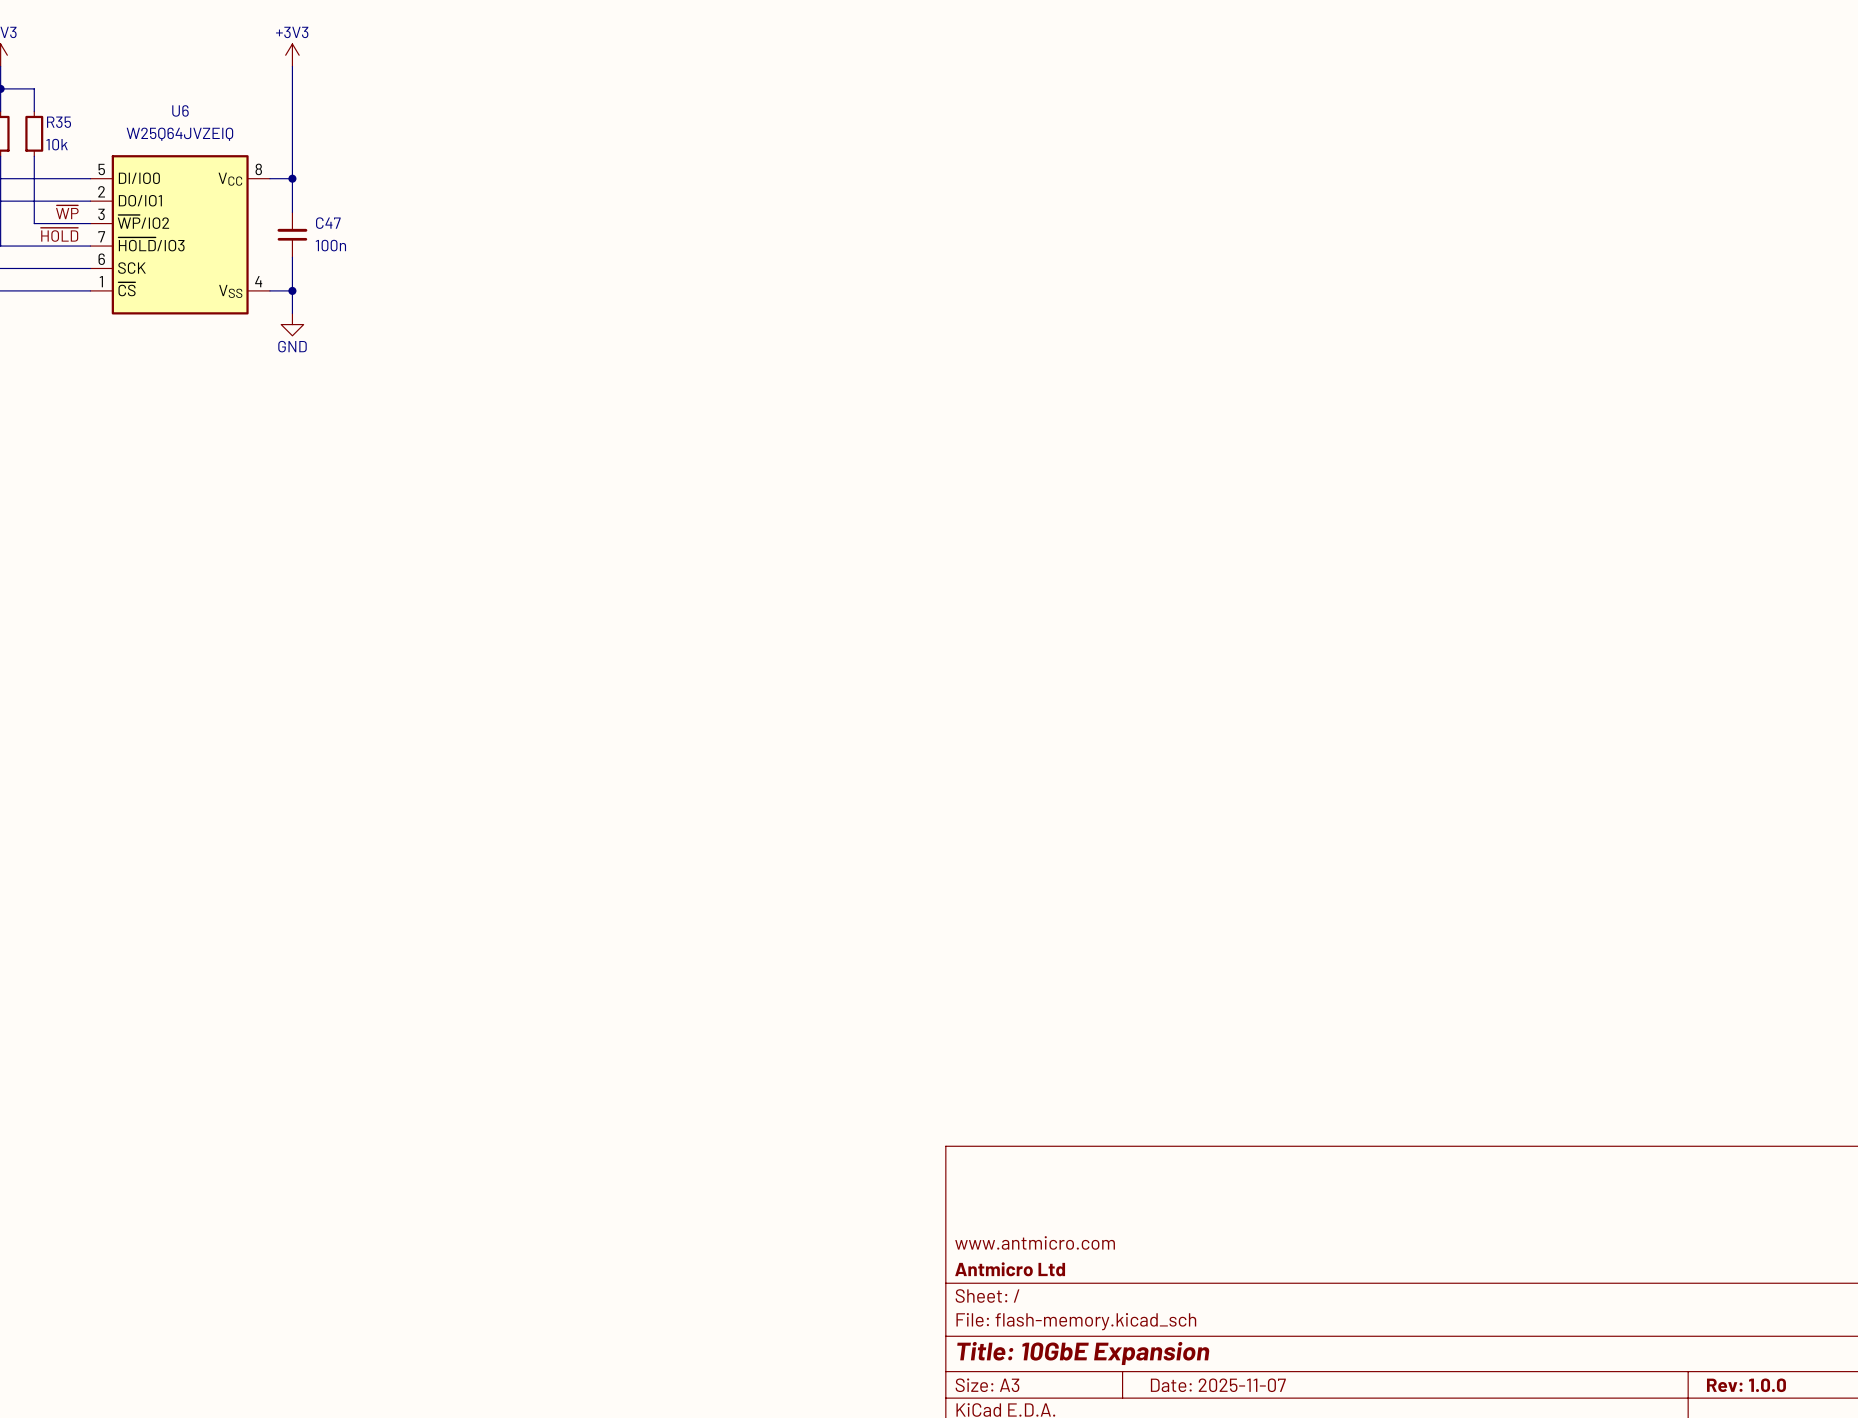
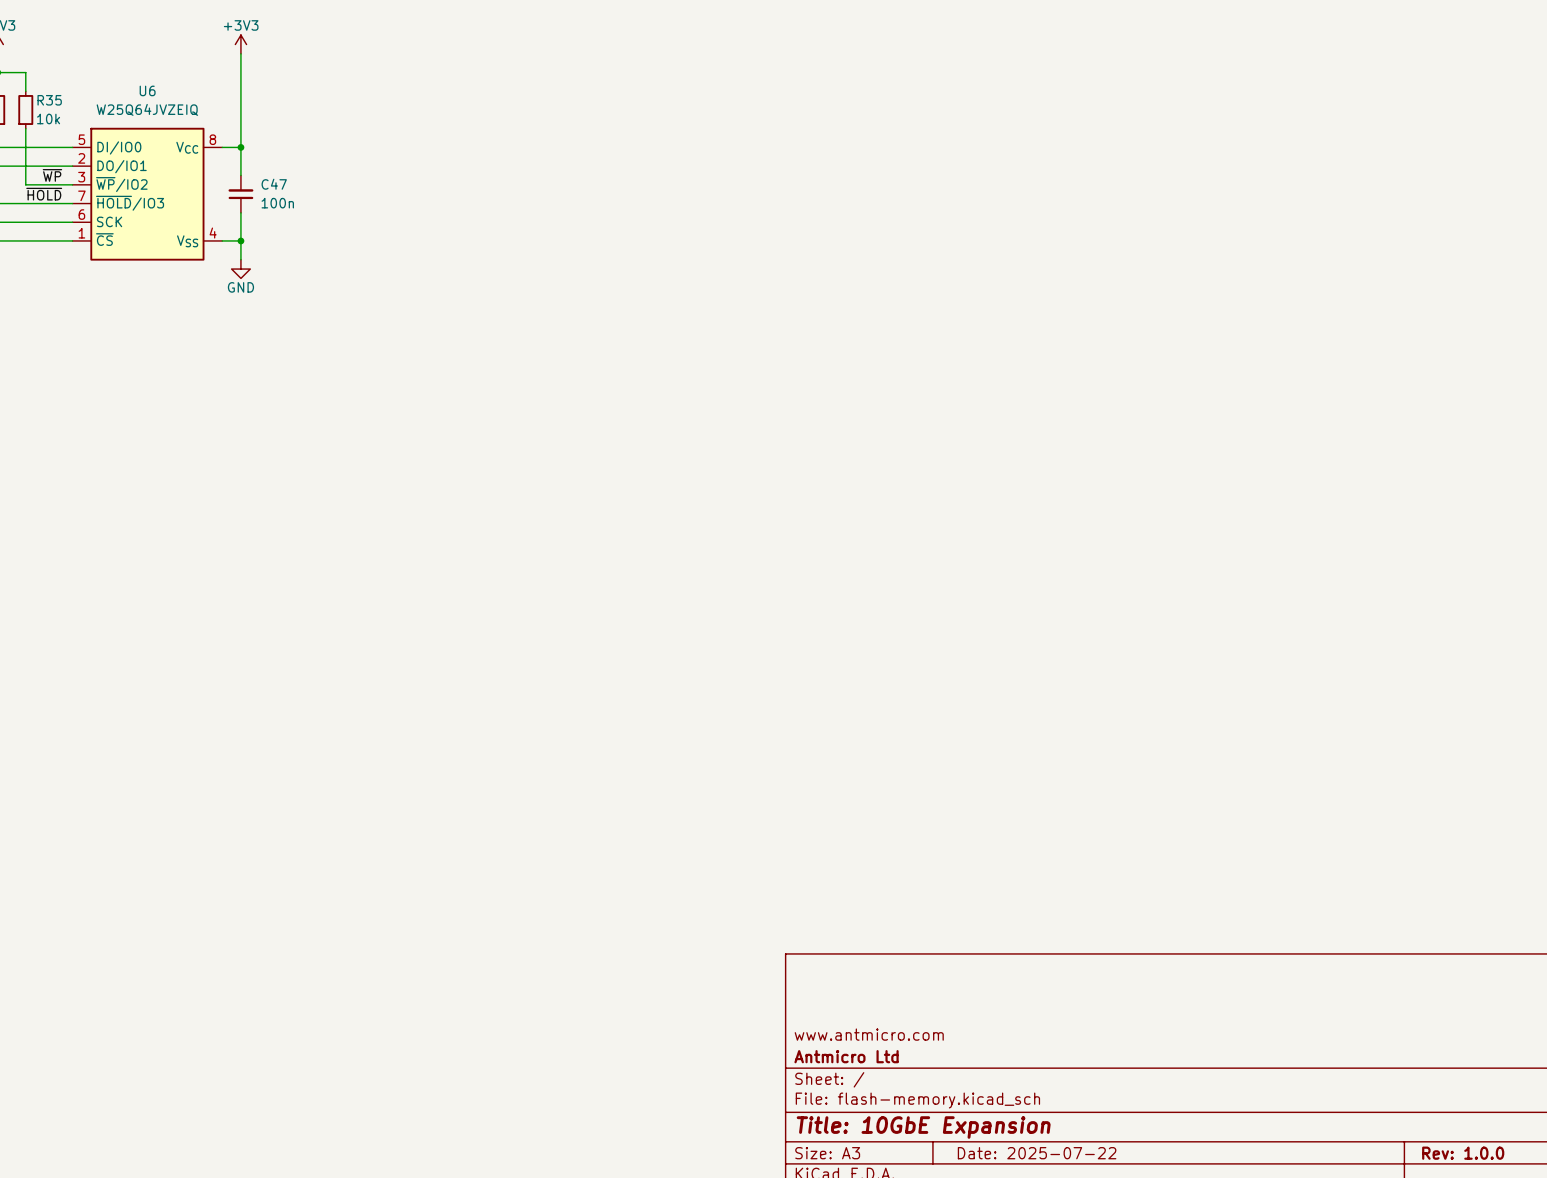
title block: Date: 2025-11-07 (1218, 1385) -> Date: 2025-07-22 (1037, 1153)

